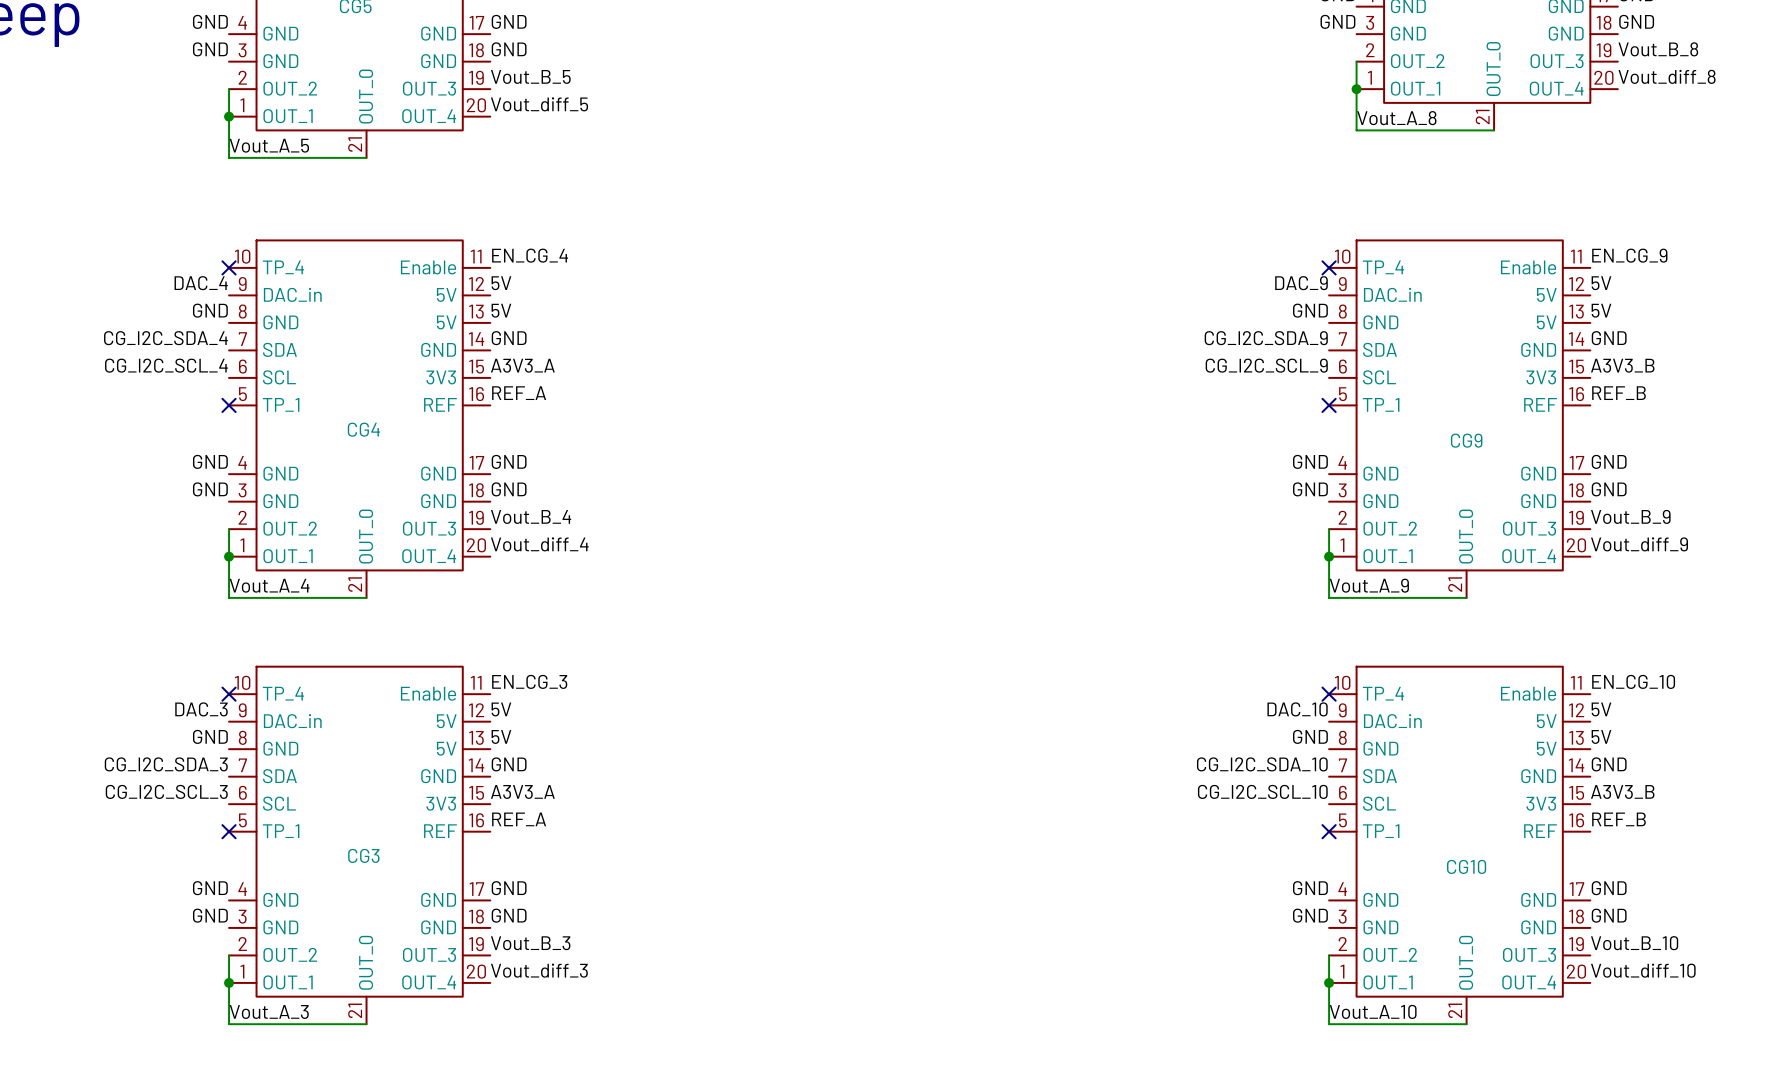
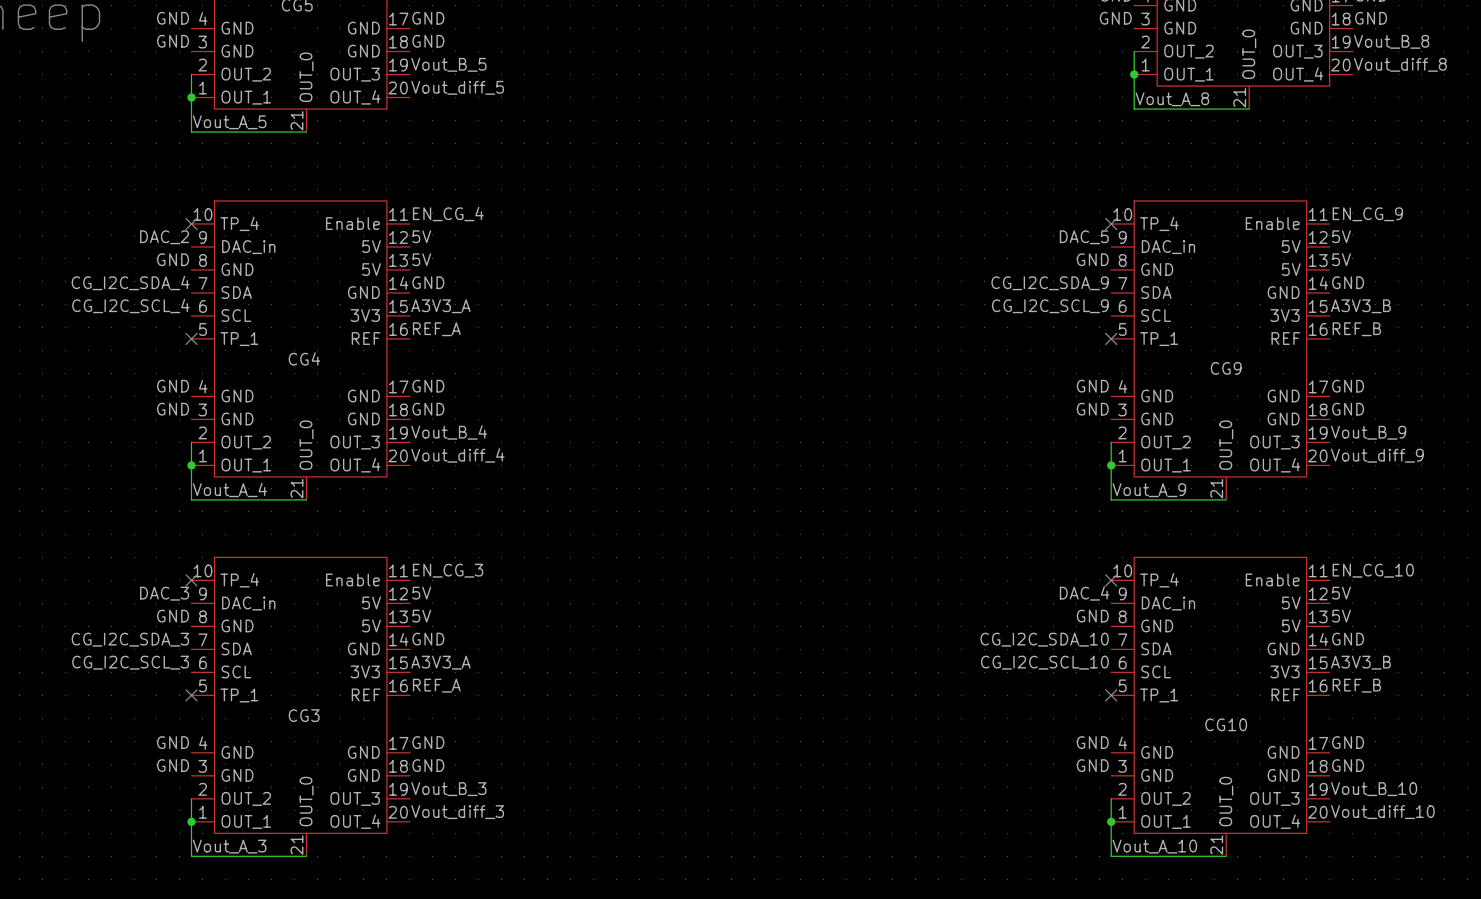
label: DAC_4 (201, 283) -> DAC_2 (164, 237)
label: DAC_9 (1301, 283) -> DAC_5 (1084, 237)
label: DAC_10 (1297, 709) -> DAC_4 (1084, 593)

